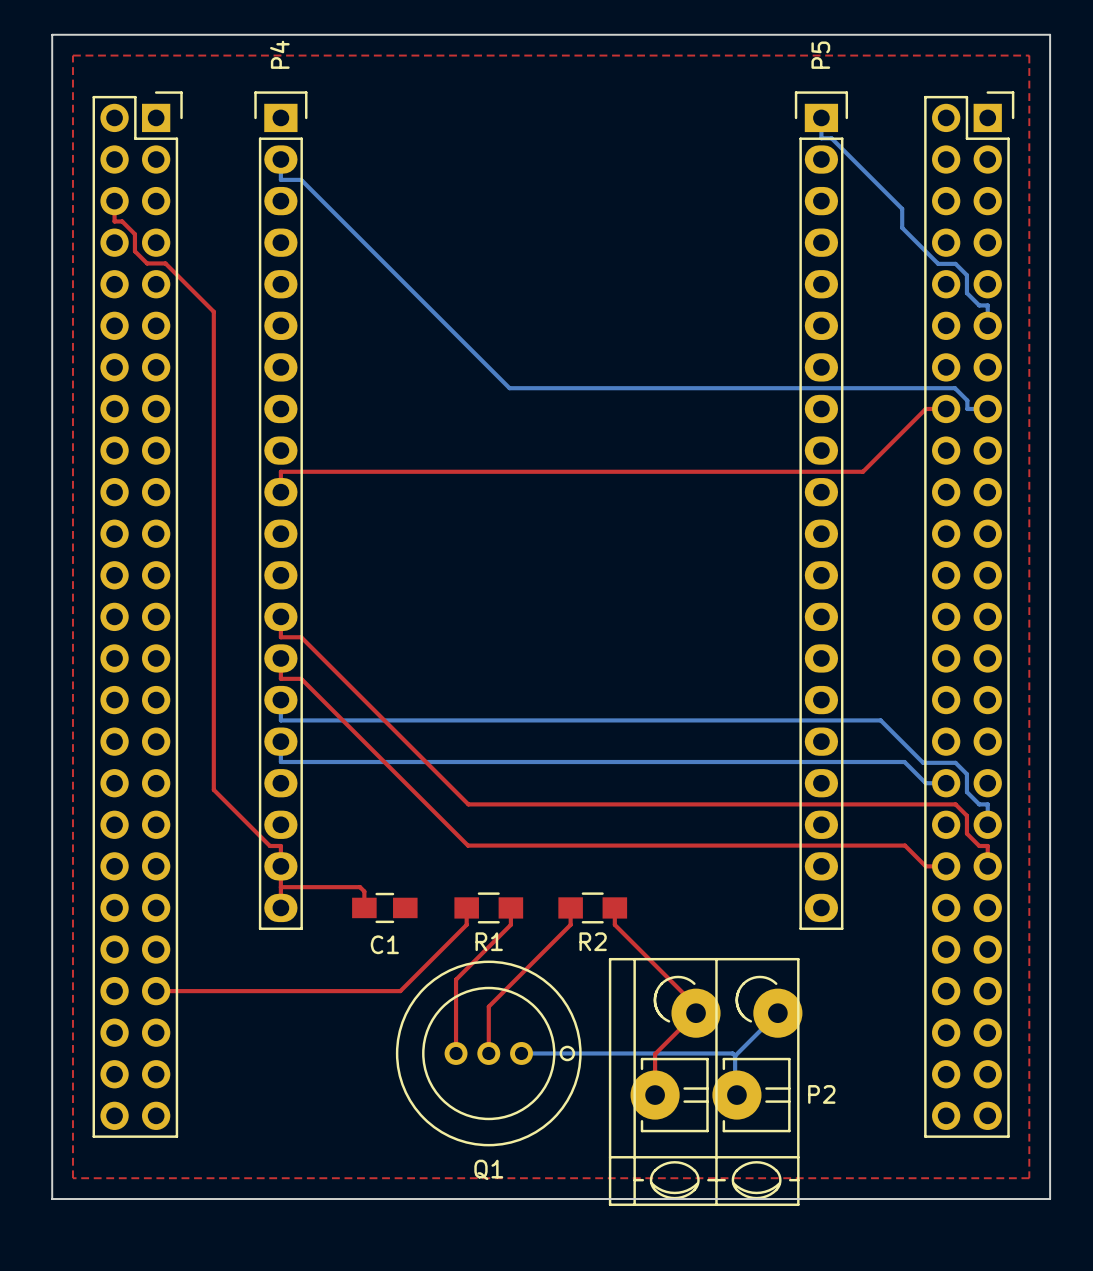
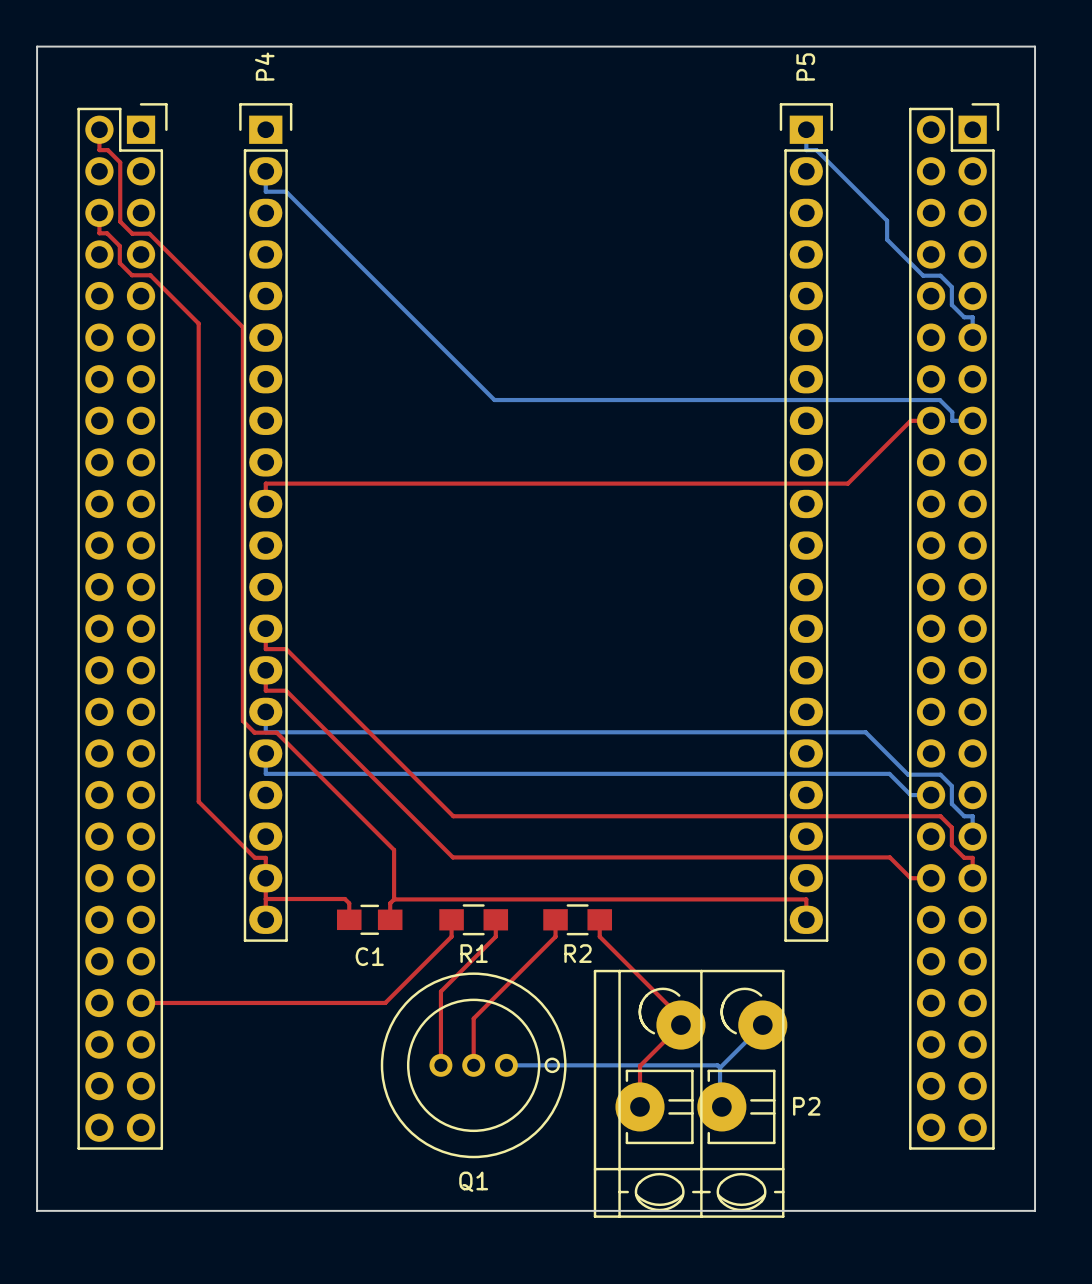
top zone outline: (72, 55) (72, 1178) (1029, 1178) (1029, 55) (72, 55) -> none
top track: none -> (99, 129) (99, 150) (107, 150) (120, 162) (120, 221) (132, 233) (149, 233) (242, 327) (242, 721) (254, 732) (276, 732) (394, 850) (394, 899)
top track: none -> (394, 899) (806, 899) (806, 919)
top track: none -> (394, 899) (390, 903) (390, 919)

